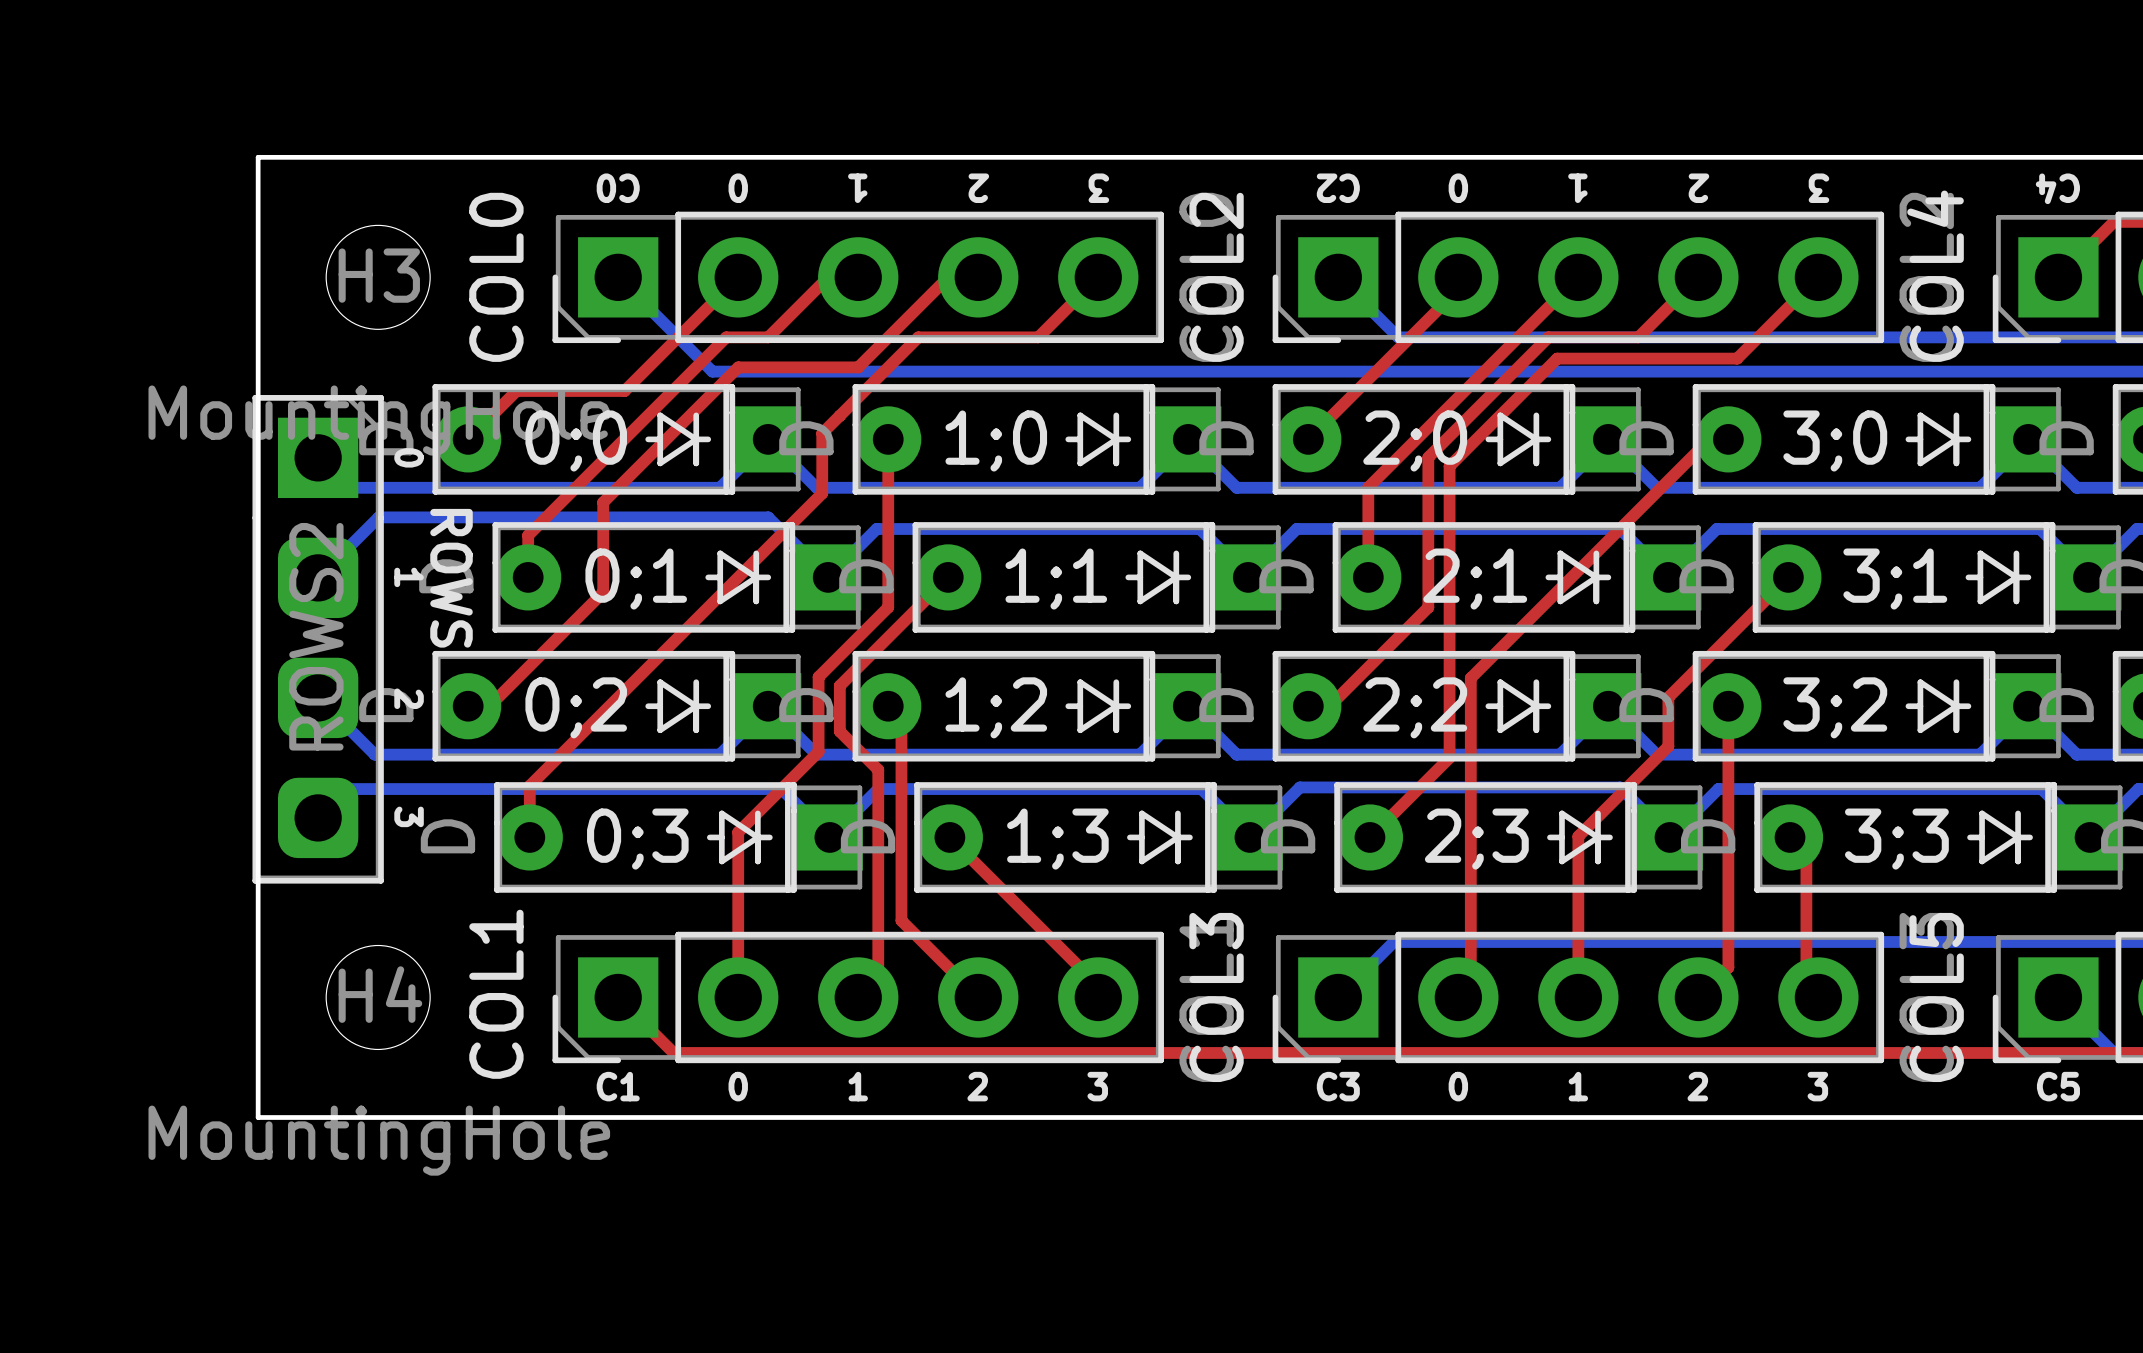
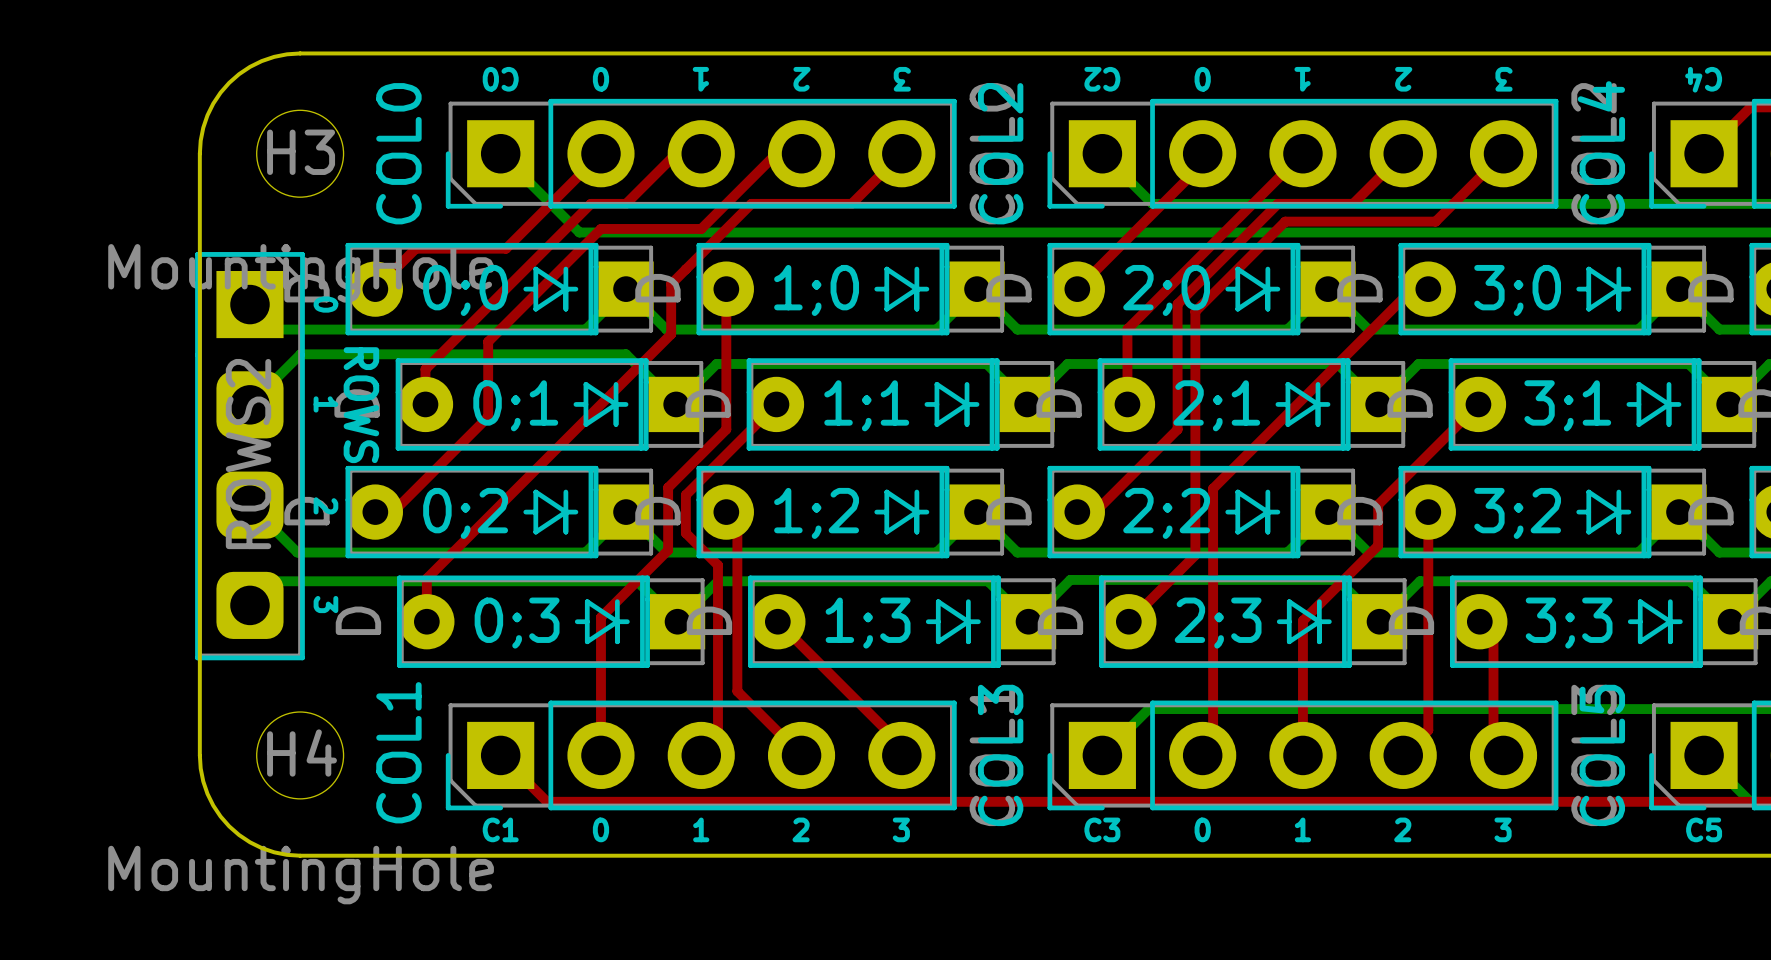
board edge: (378, 157) (258, 157) (258, 277) -> (300, 53) (287, 54) (261, 61) (239, 74) (229, 82) (213, 103) (207, 115) (203, 127) (199, 153)
board edge: (258, 997) (258, 1117) (378, 1117) -> (199, 755) (203, 781) (207, 793) (213, 805) (229, 826) (249, 842) (261, 848) (287, 854) (300, 855)

